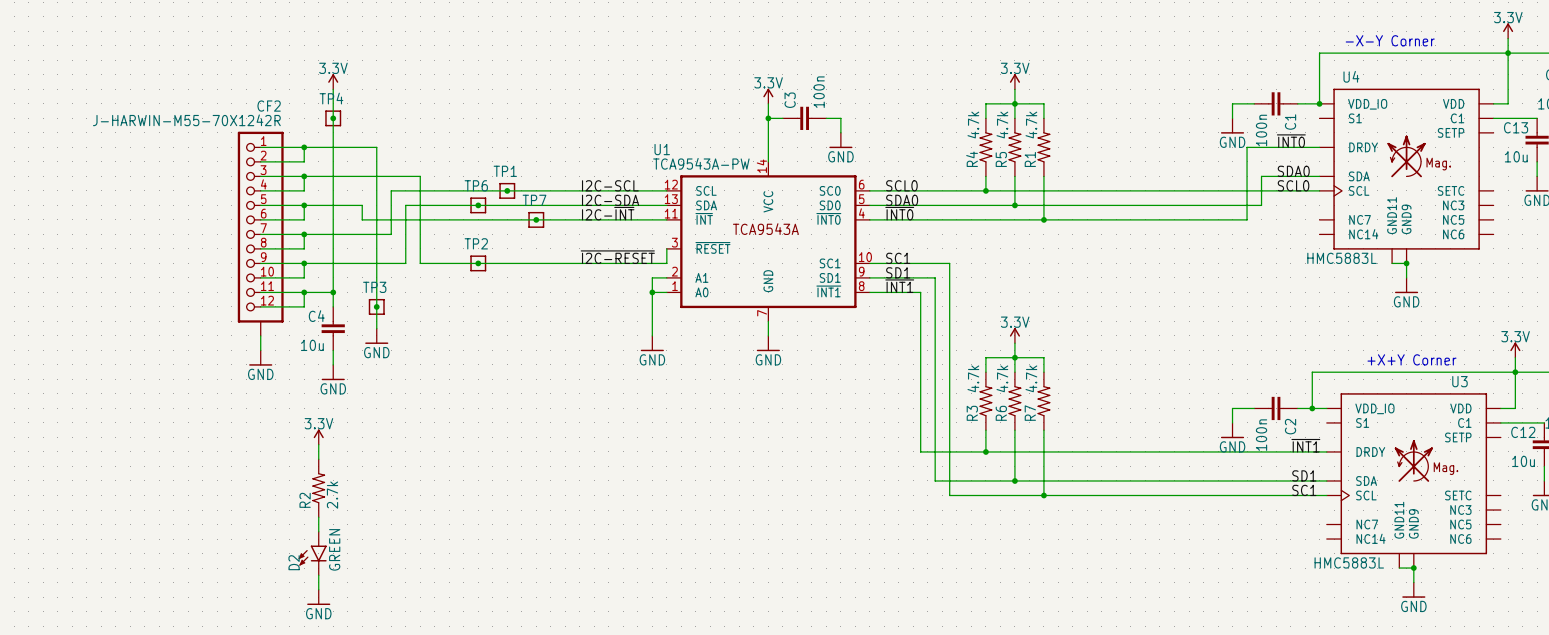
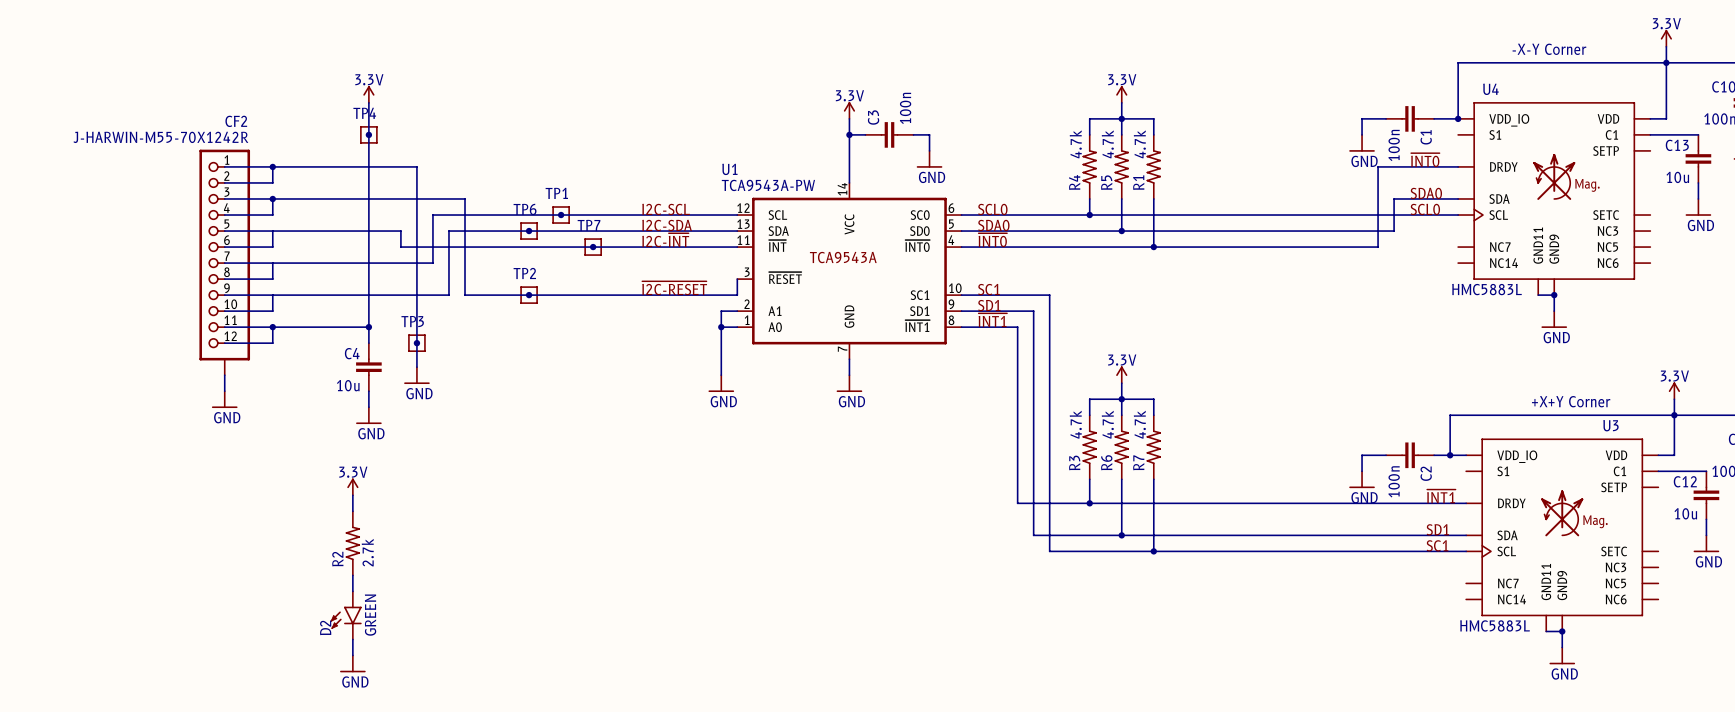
wire: none -> (224, 166) (288, 166)
junction: none -> (272, 166)
wire: (304, 147) (304, 161) (260, 161) -> (272, 166) (272, 182) (224, 182)
junction: (304, 147) -> none
wire: none -> (224, 198) (288, 198)
junction: none -> (272, 198)
wire: (304, 176) (304, 190) (260, 190) -> (272, 198) (272, 215) (224, 215)
junction: (304, 176) -> none
wire: none -> (224, 231) (288, 231)
wire: (304, 205) (304, 219) (260, 219) -> (272, 231) (272, 247) (224, 247)
junction: (304, 205) -> none
CF2 position: (260, 233) -> (224, 262)
wire: none -> (224, 263) (288, 263)
wire: (304, 234) (304, 248) (260, 248) -> (272, 263) (272, 279) (224, 279)
junction: (304, 234) -> none
wire: none -> (224, 295) (288, 295)
wire: (304, 263) (304, 277) (260, 277) -> (272, 295) (272, 311) (224, 311)
junction: (304, 263) -> none
wire: none -> (224, 327) (288, 327)
junction: none -> (272, 327)
wire: (304, 292) (304, 306) (260, 306) -> (272, 327) (272, 343) (224, 343)
junction: (304, 292) -> none
wire: (260, 335) (260, 350) -> (224, 375) (224, 391)
power symbol position: GND (260, 358) -> GND (224, 399)

